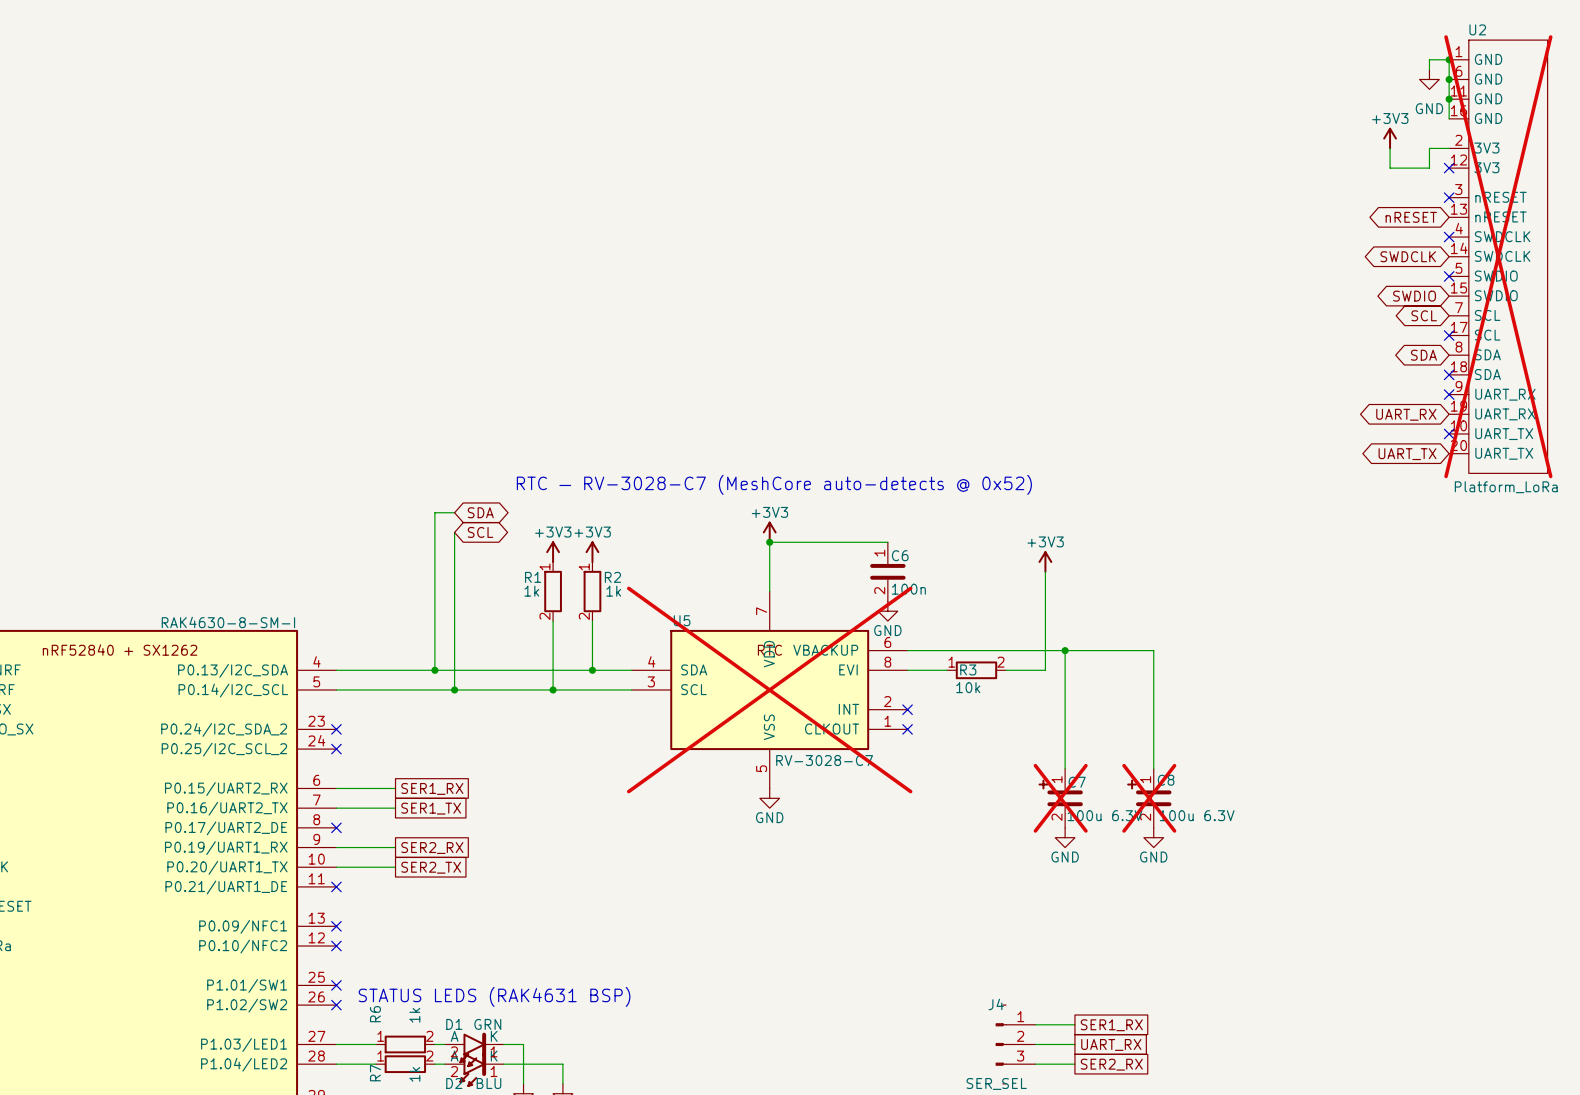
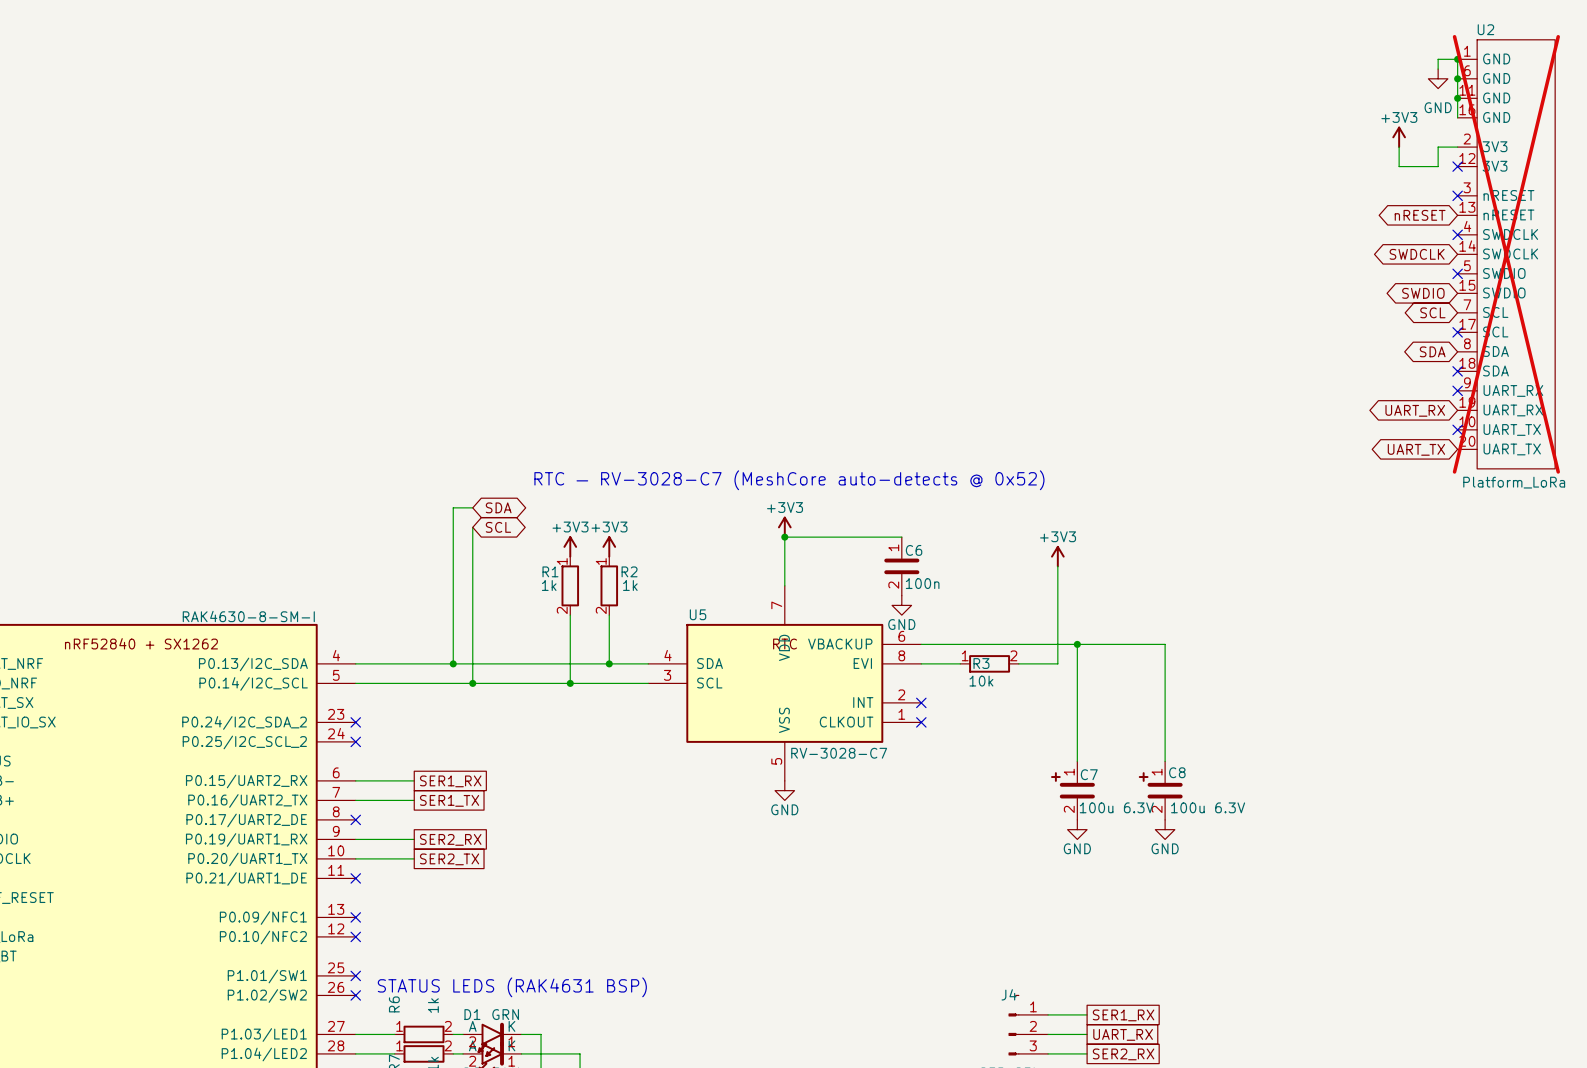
U5 do-not-place cross: (769, 689) -> none
C7 do-not-place cross: (1060, 798) -> none
C8 do-not-place cross: (1149, 798) -> none

